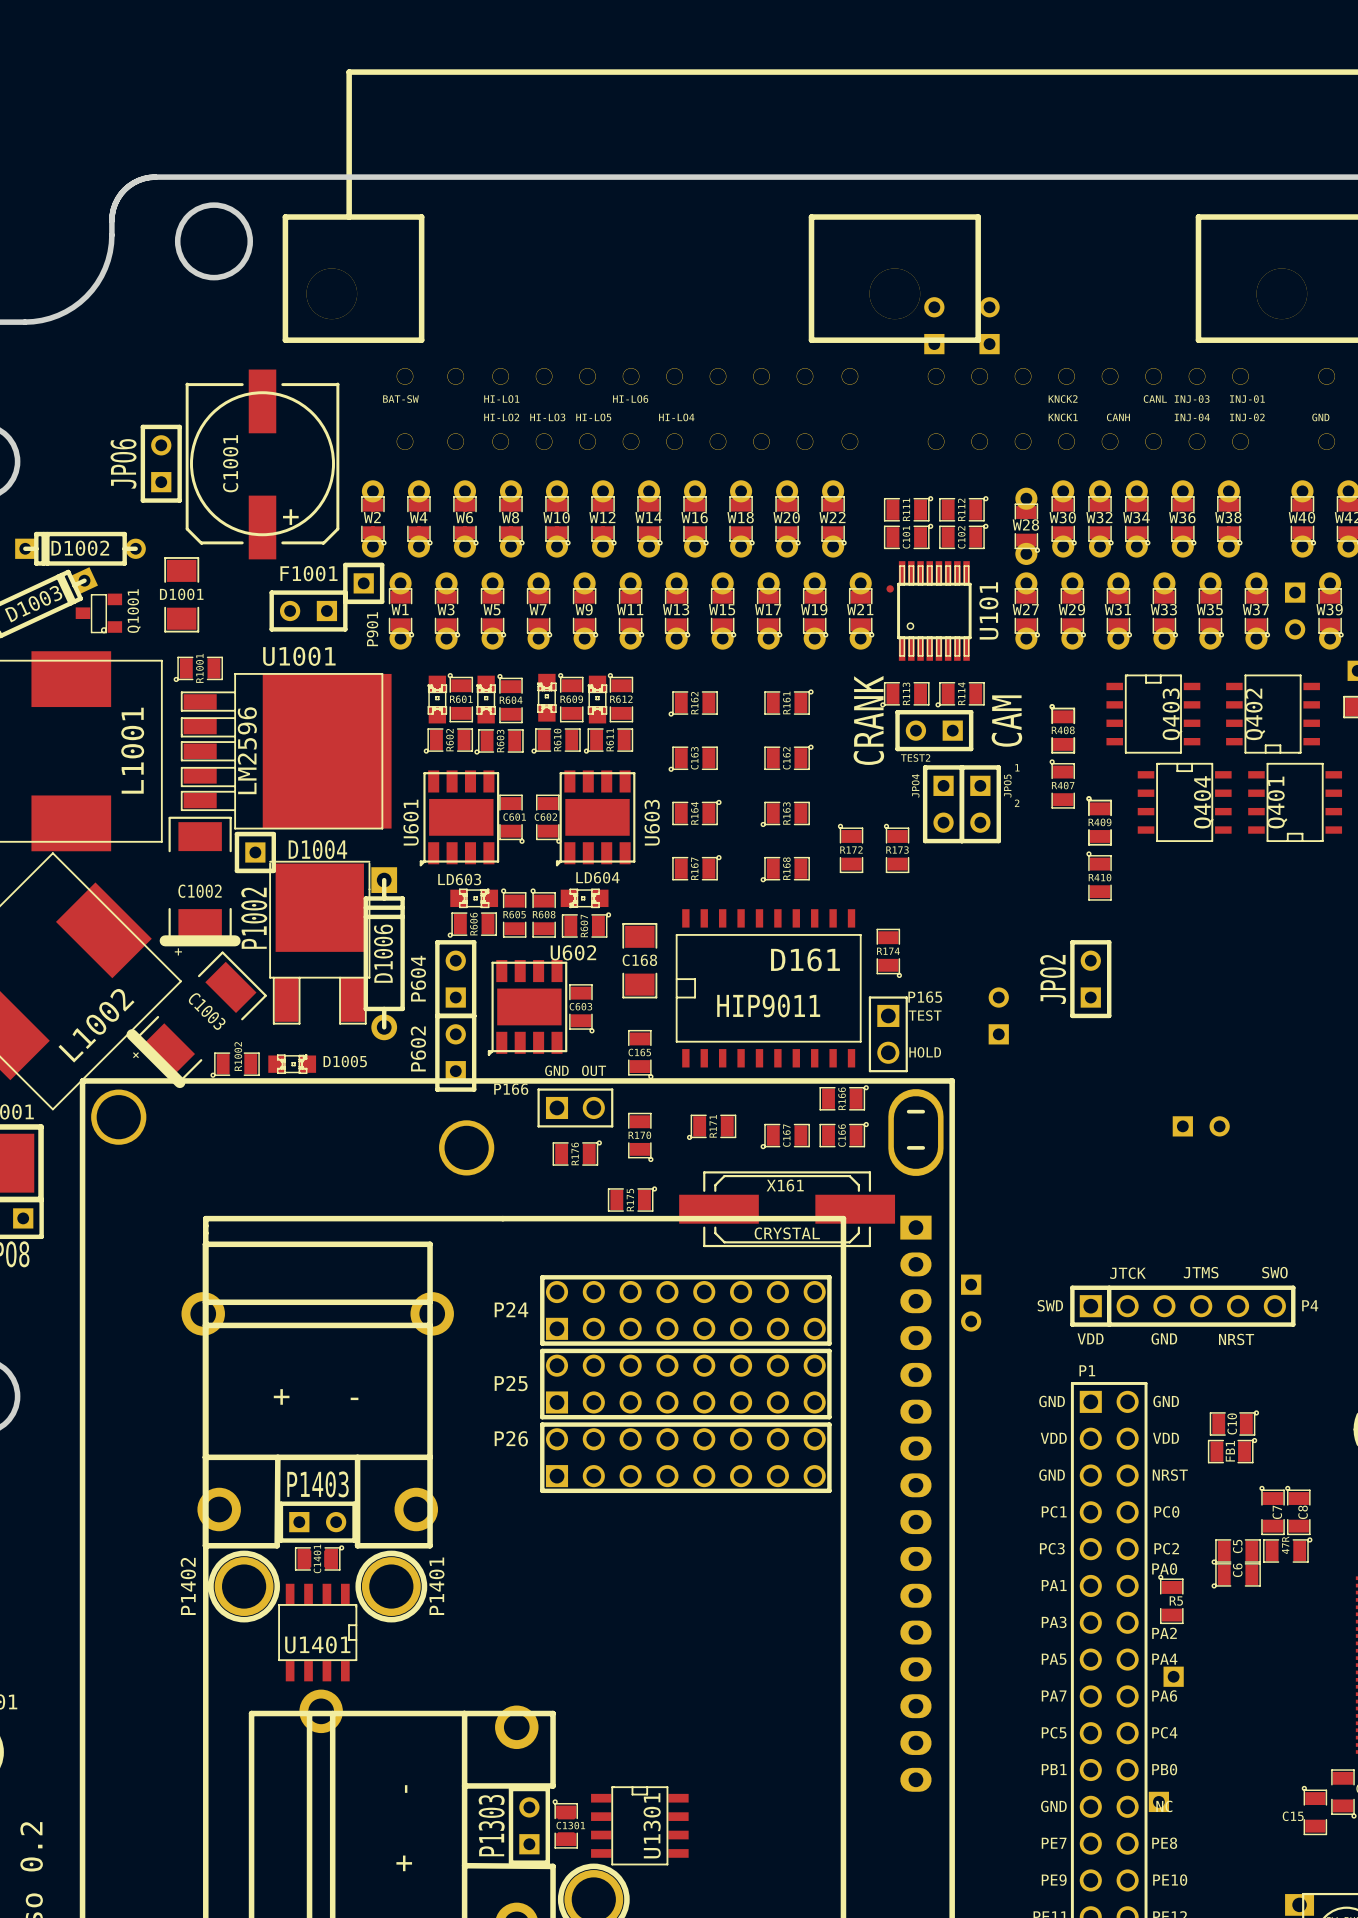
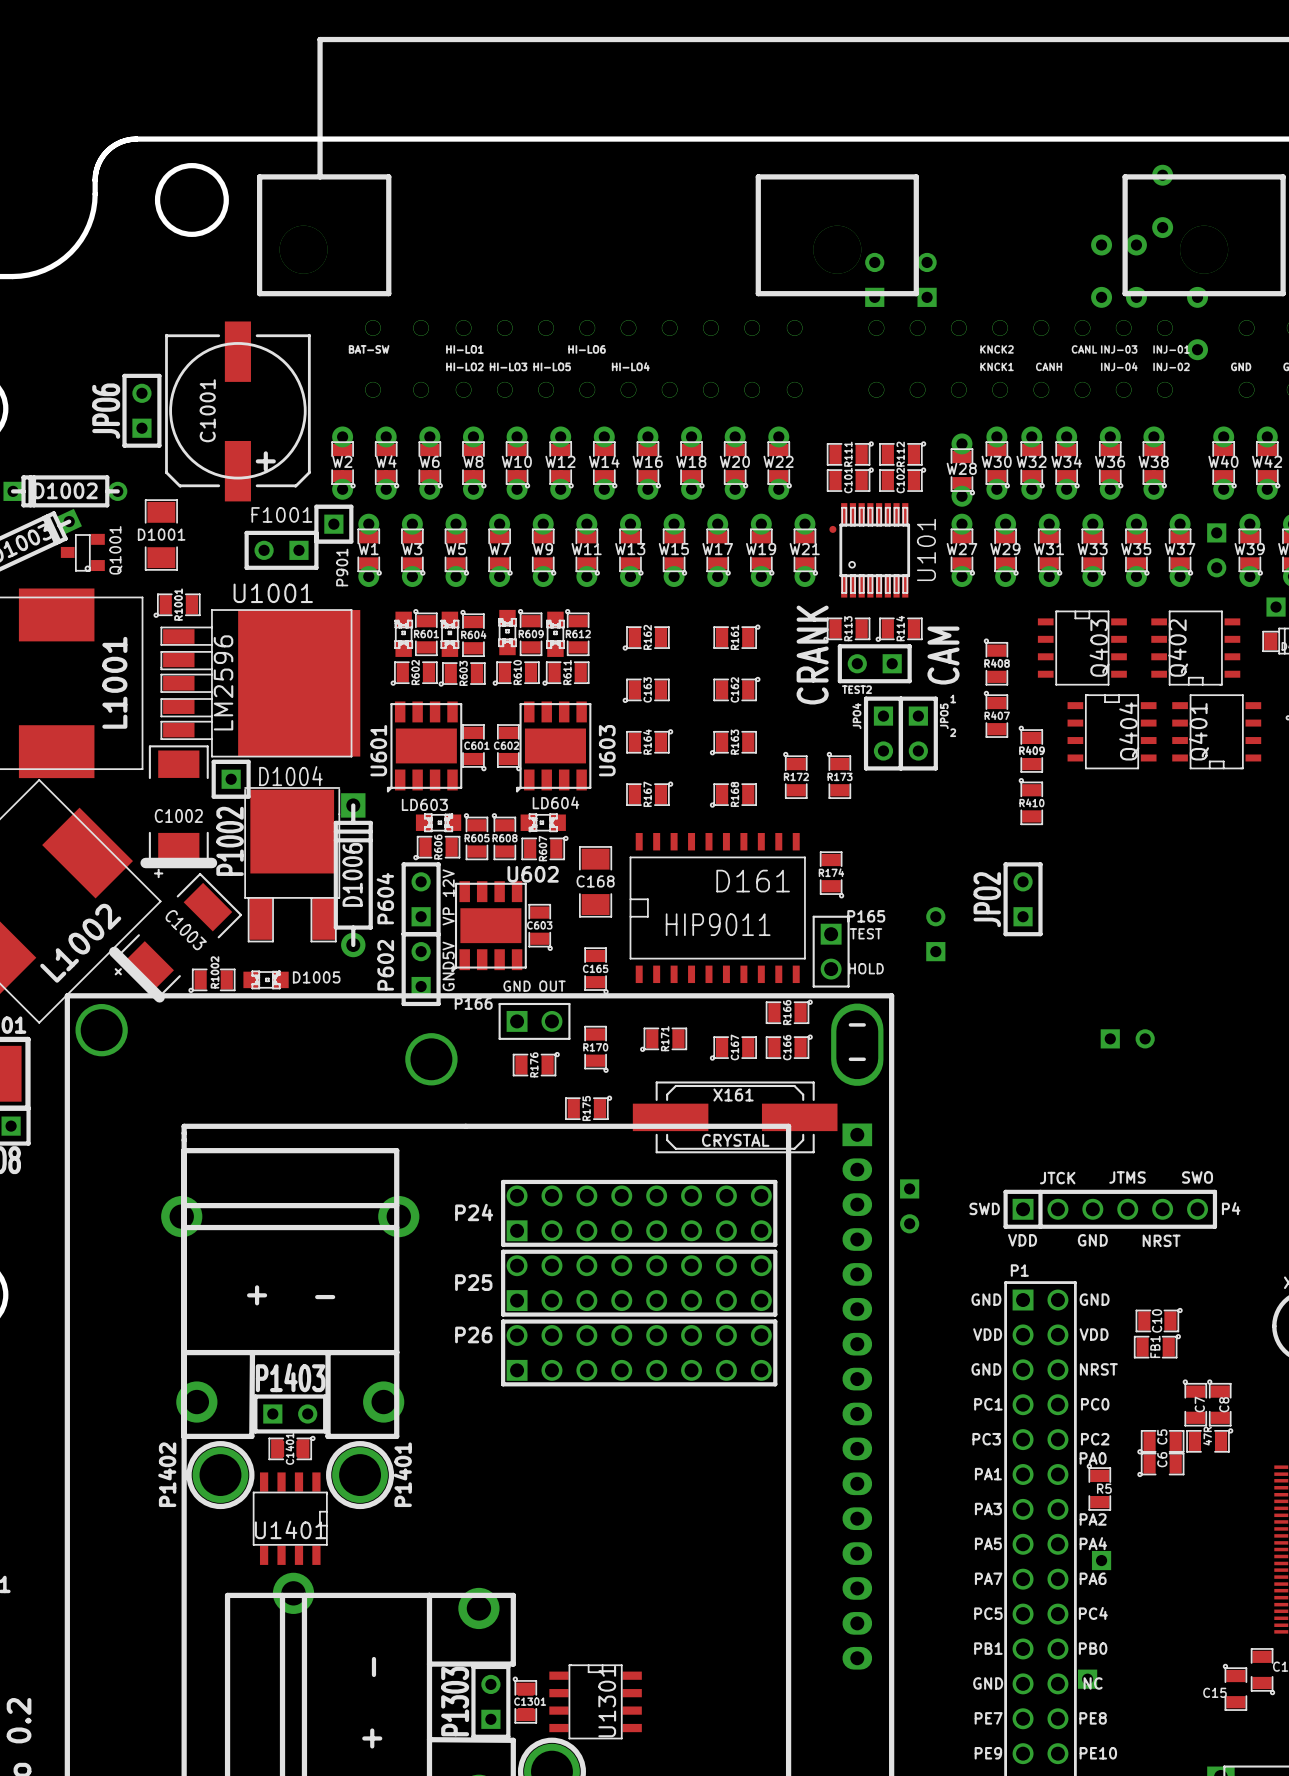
part: none -> (1162, 201)
part: none -> (1101, 271)
part: none -> (1136, 271)
part: none -> (1197, 323)
text: none -> GND5V VP 12V (448, 930)

